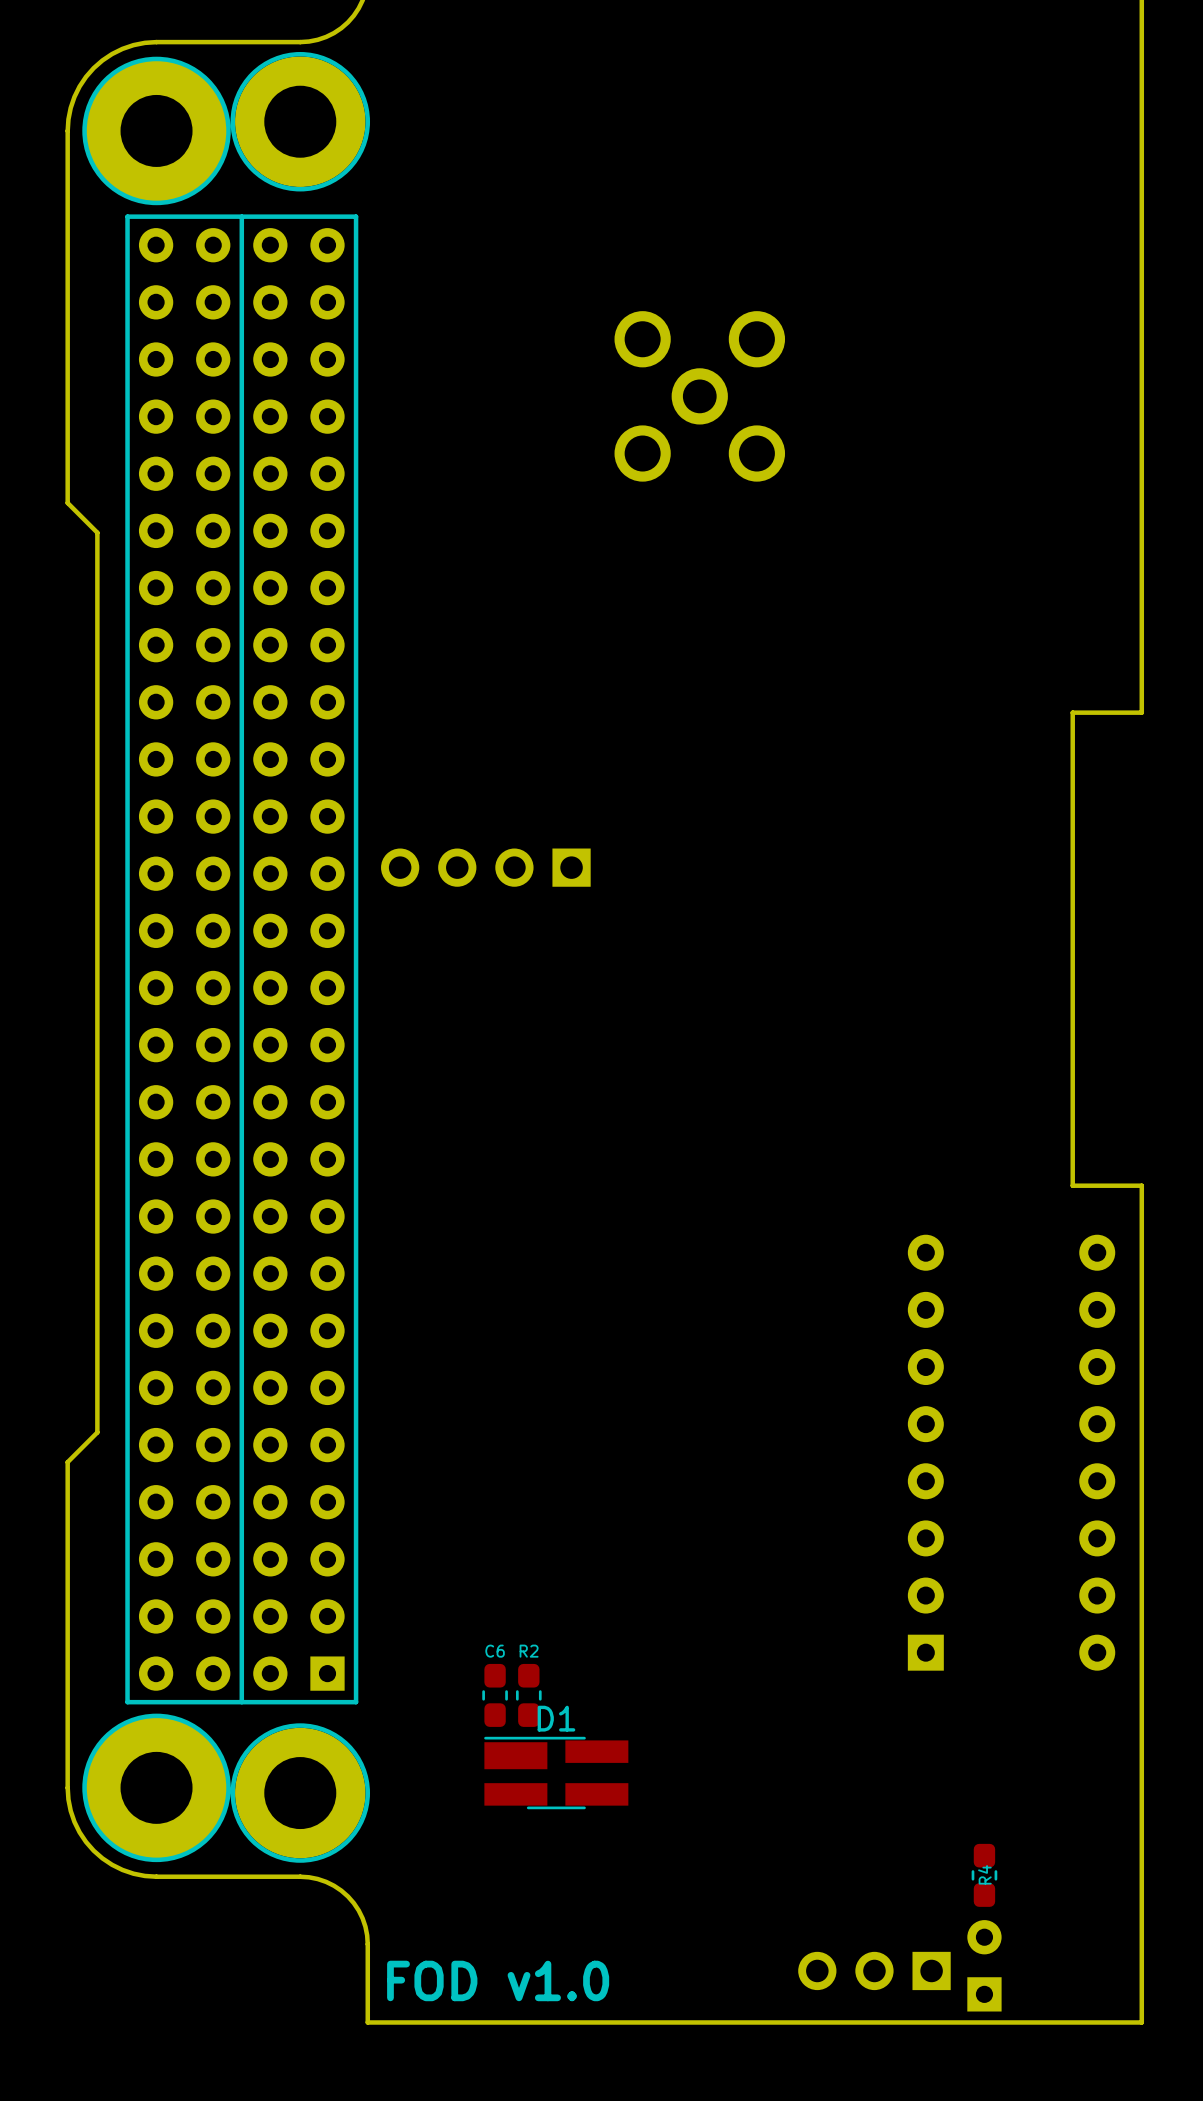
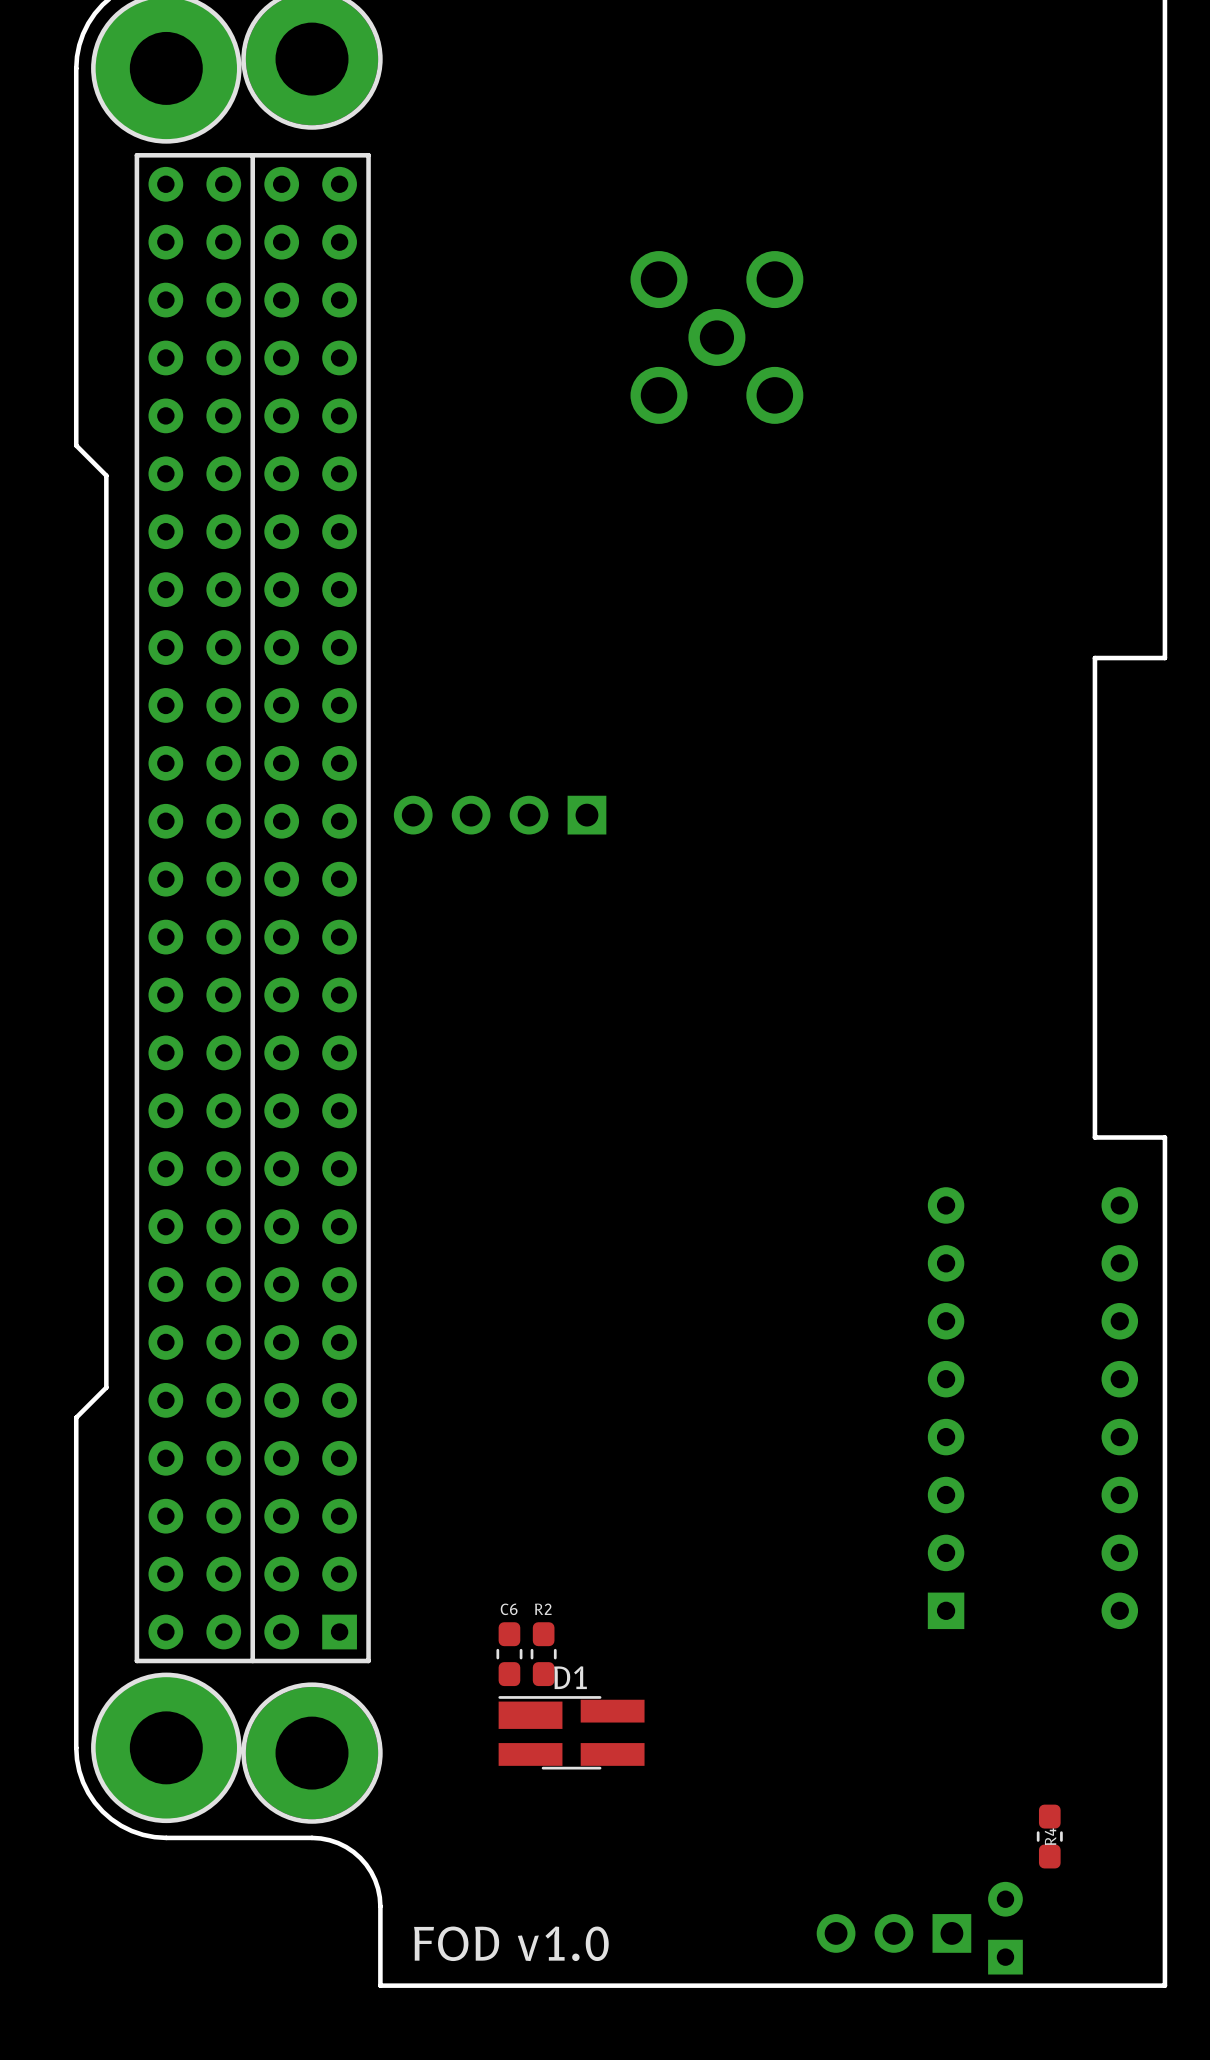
R4 position: (984, 1875) -> (1049, 1836)

